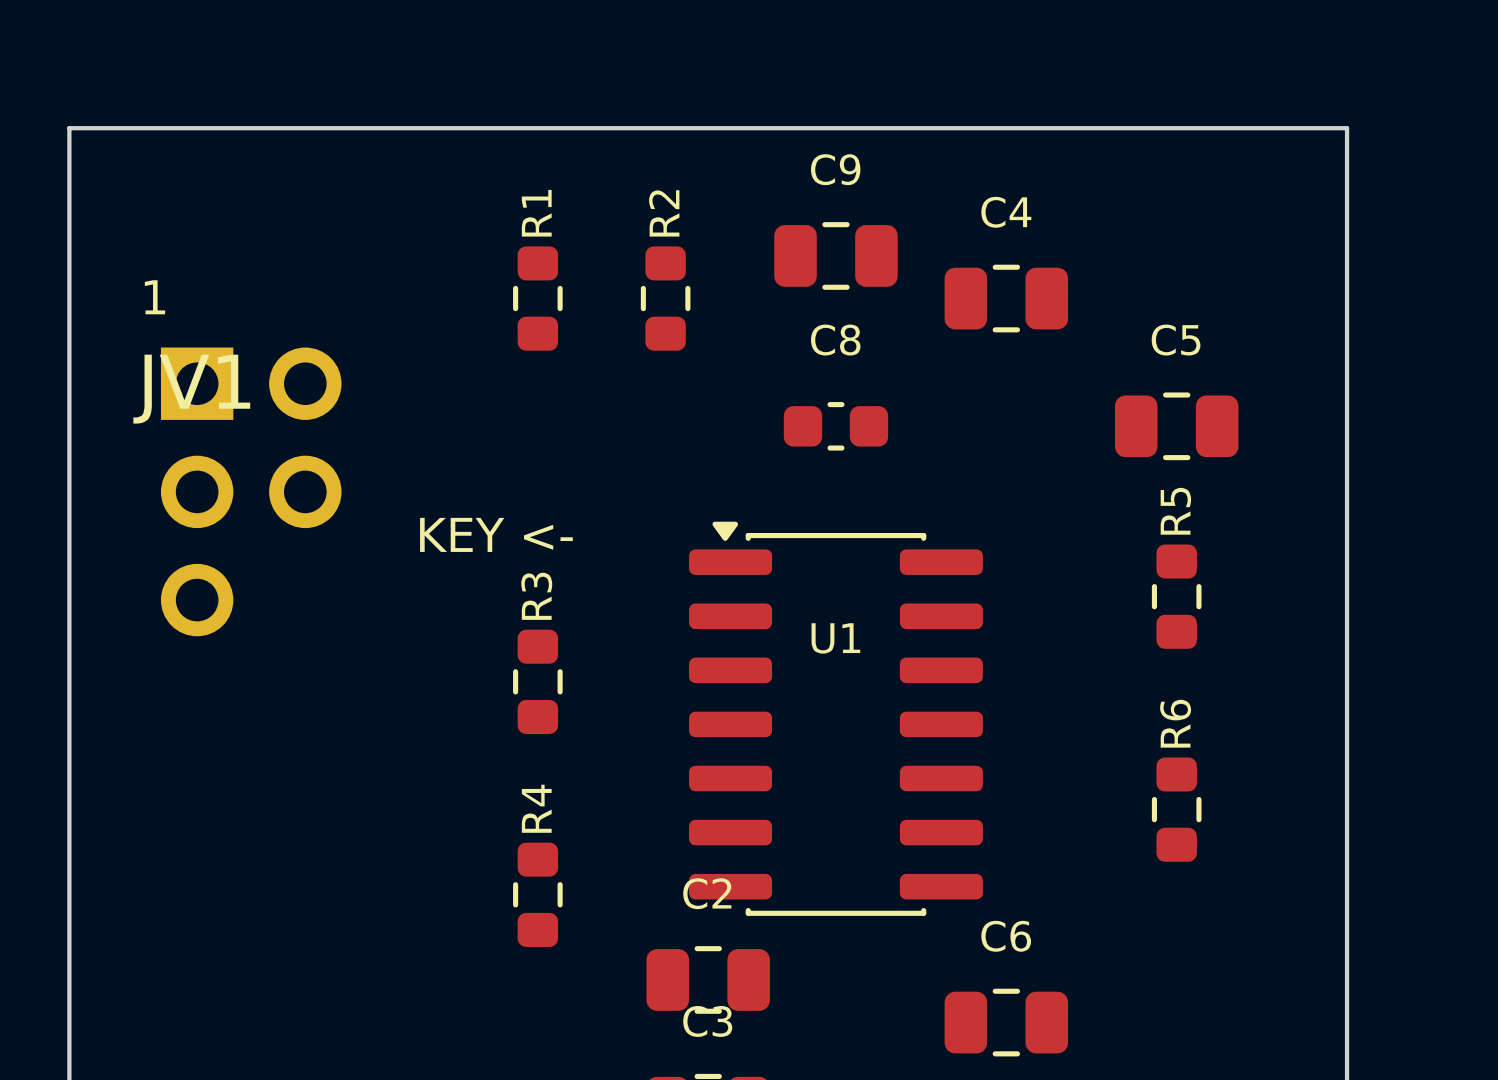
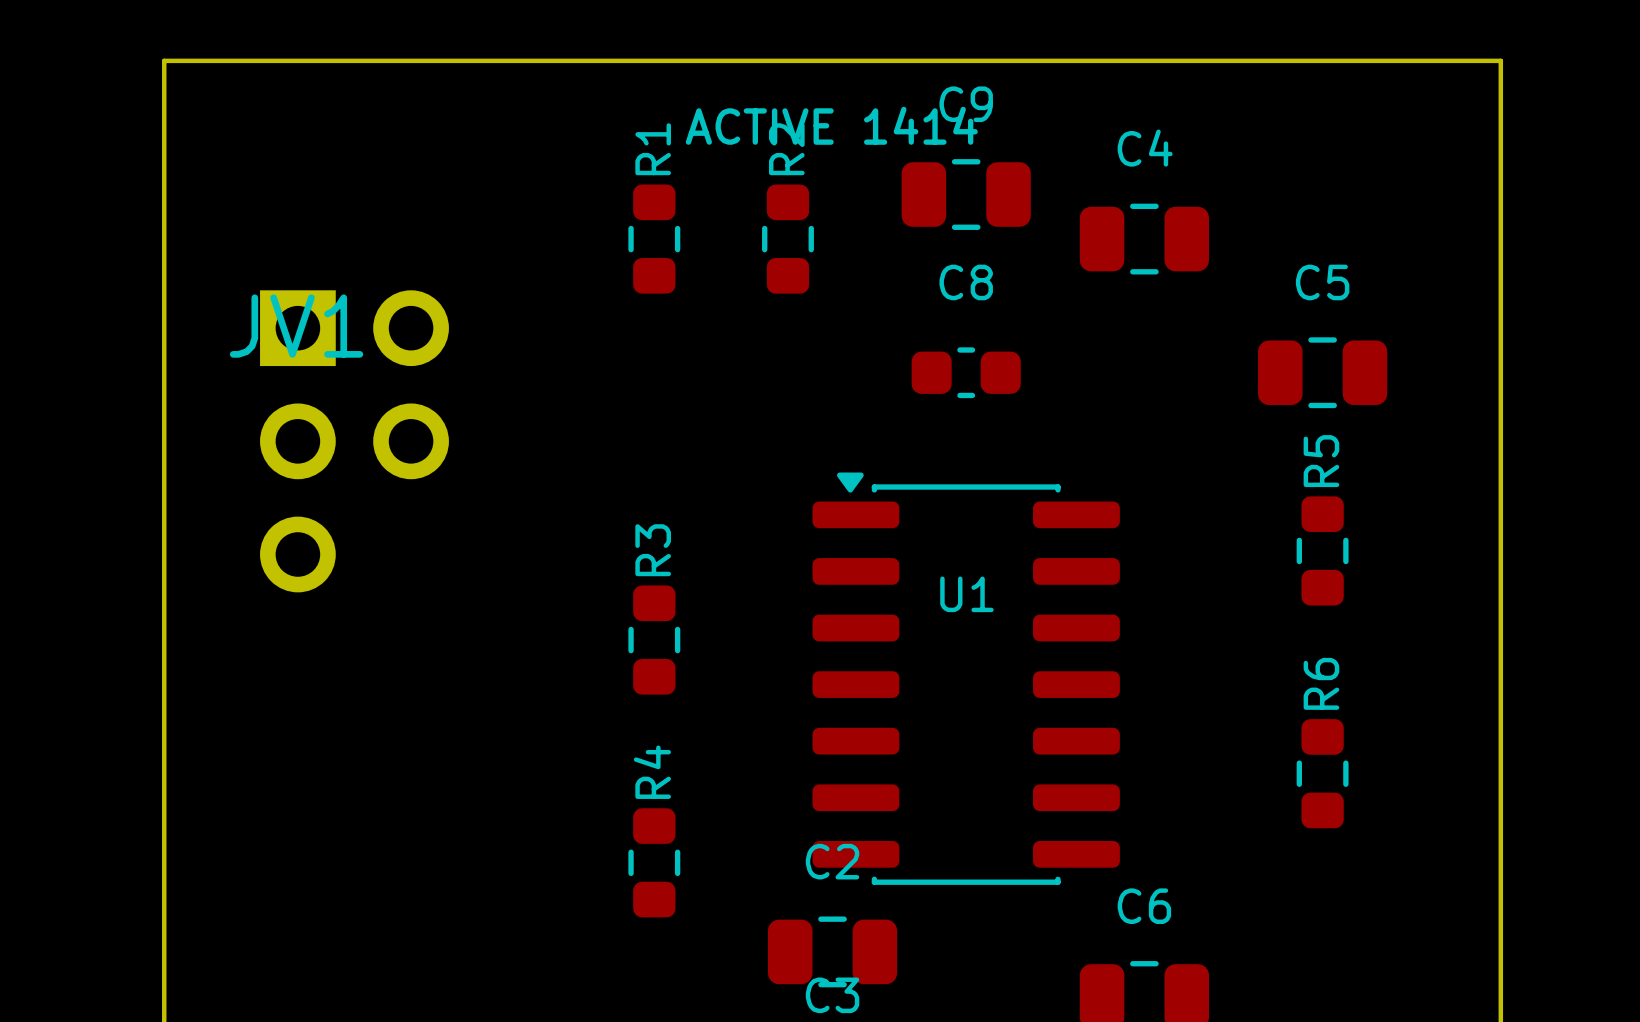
text: none -> ACTIVE 1414 (831, 125)
text: 1 (154, 297) -> none
text: KEY <- (496, 534) -> none

